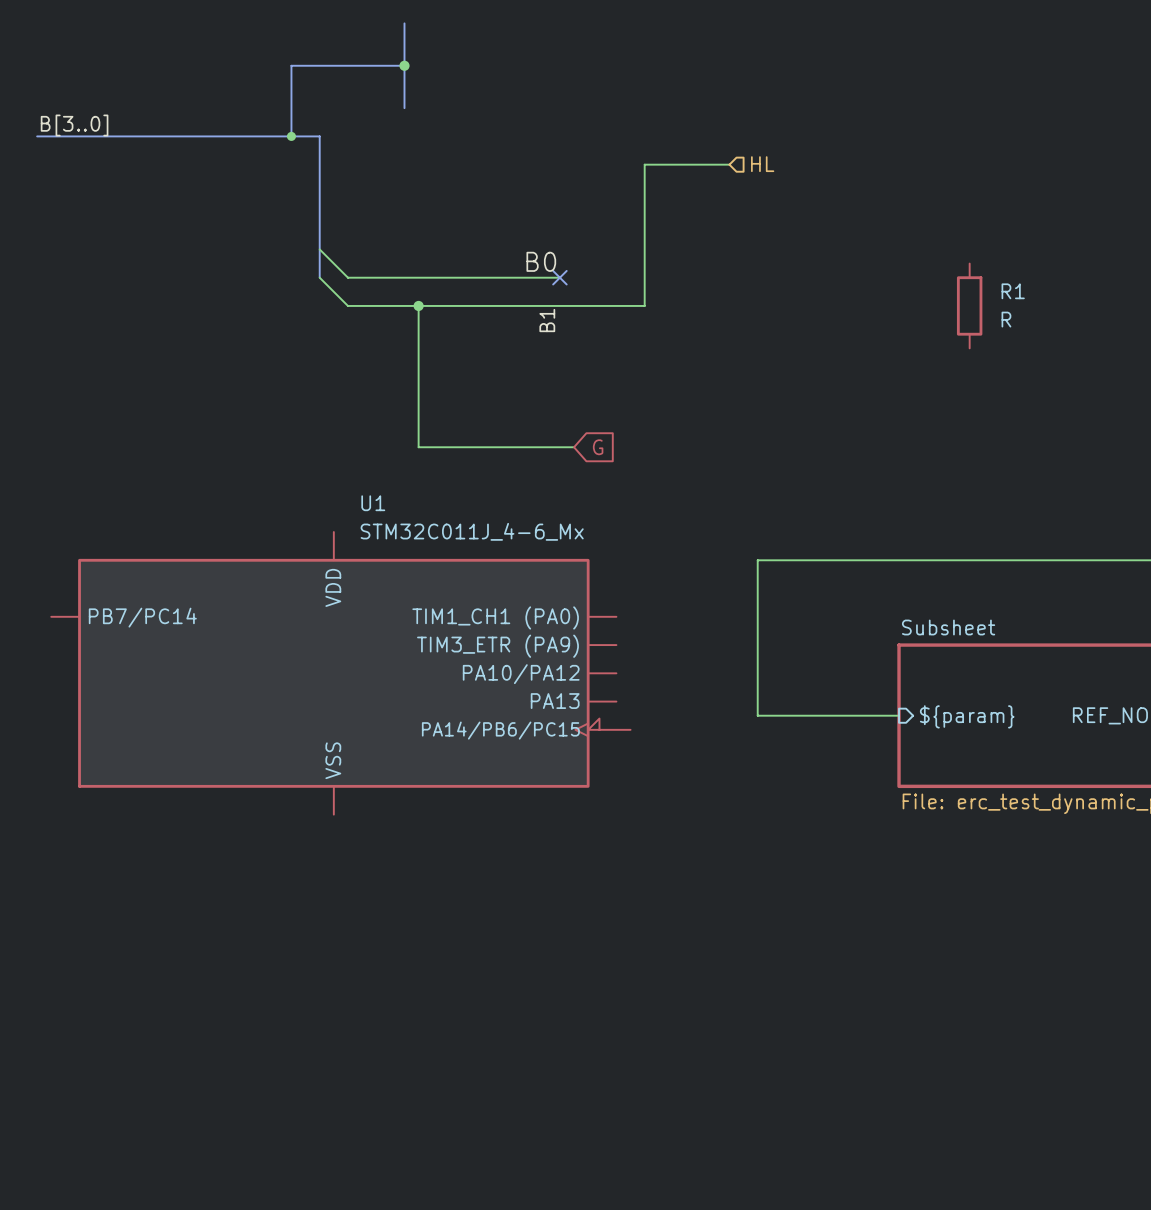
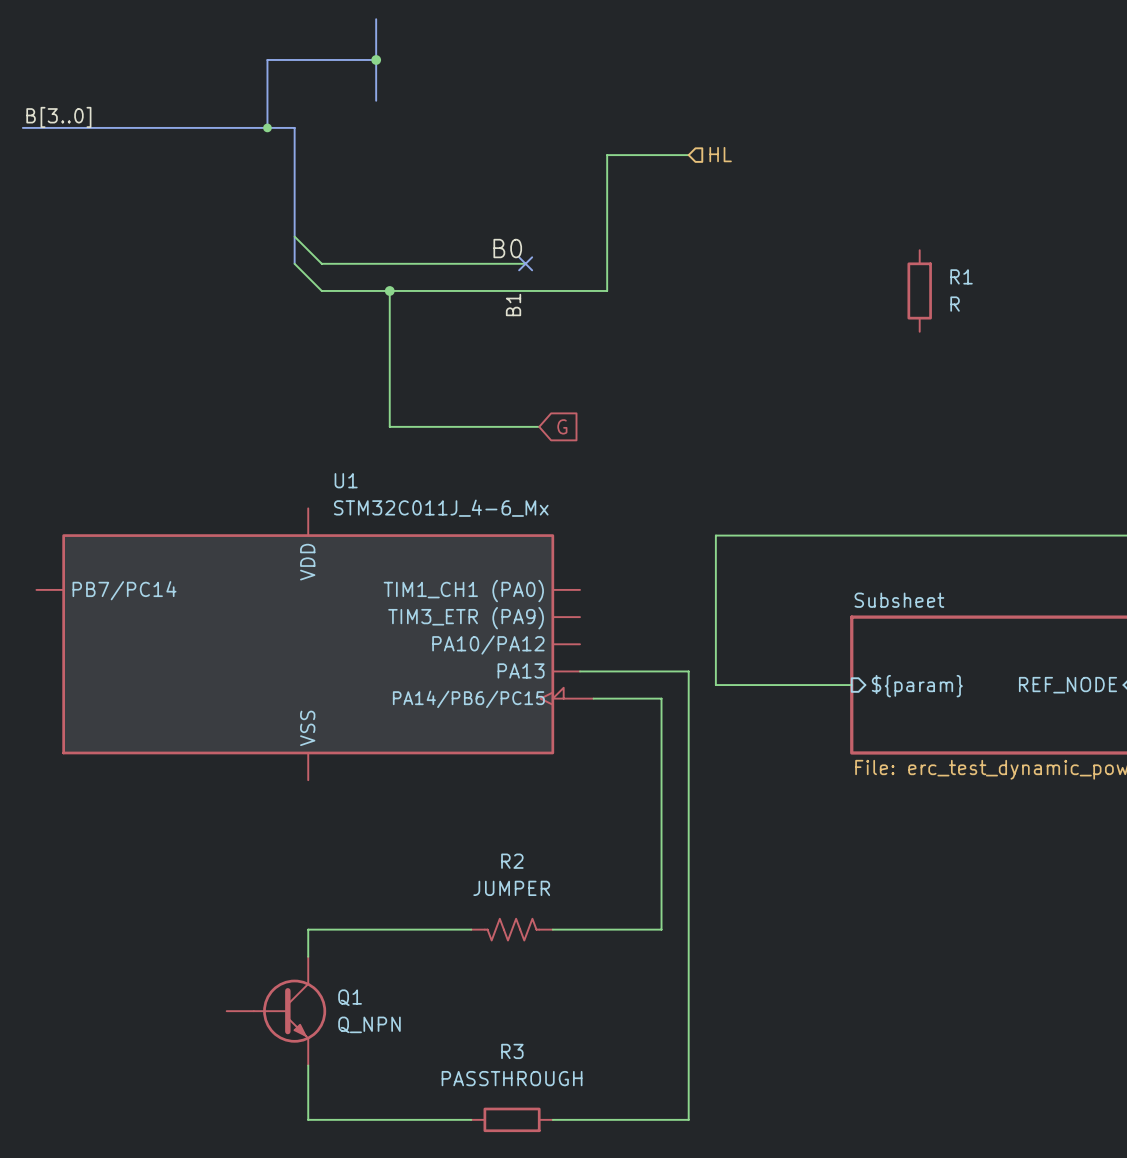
wire: none -> (579, 671) (688, 671) (688, 1119) (552, 1119)
wire: none -> (593, 698) (661, 698) (661, 929) (552, 929)
wire: none -> (471, 929) (308, 929) (308, 956)
R2: none -> JUMPER (512, 929)
Q1: none -> Q_NPN (276, 1011)
wire: none -> (308, 1065) (308, 1119) (471, 1119)
R3: none -> PASSTHROUGH (512, 1119)

